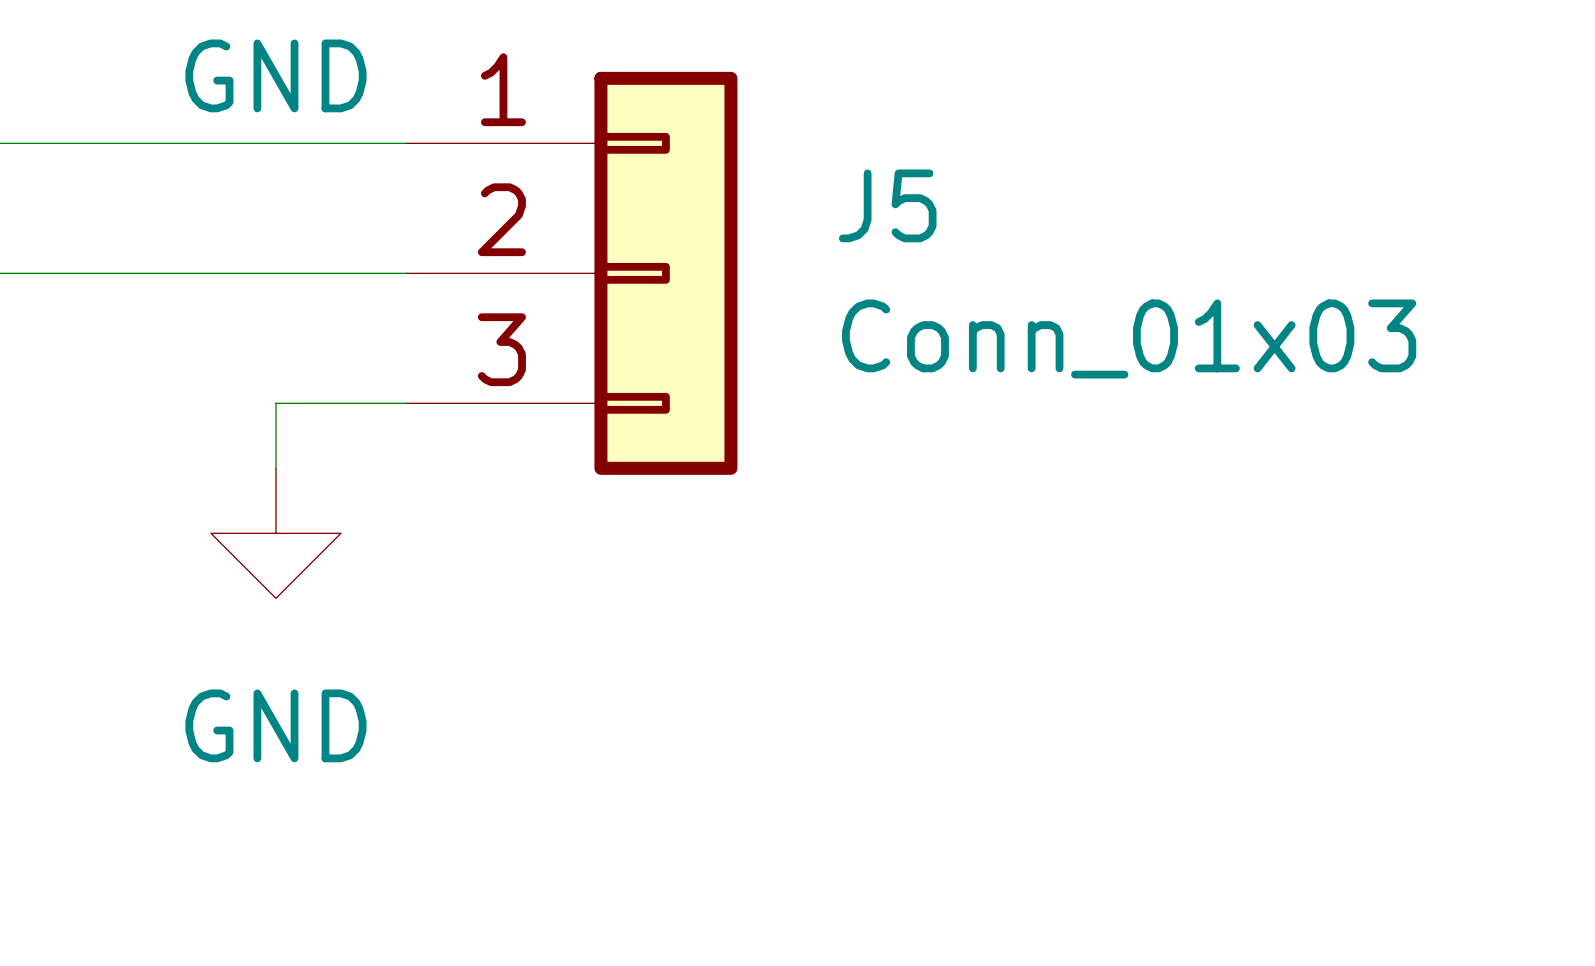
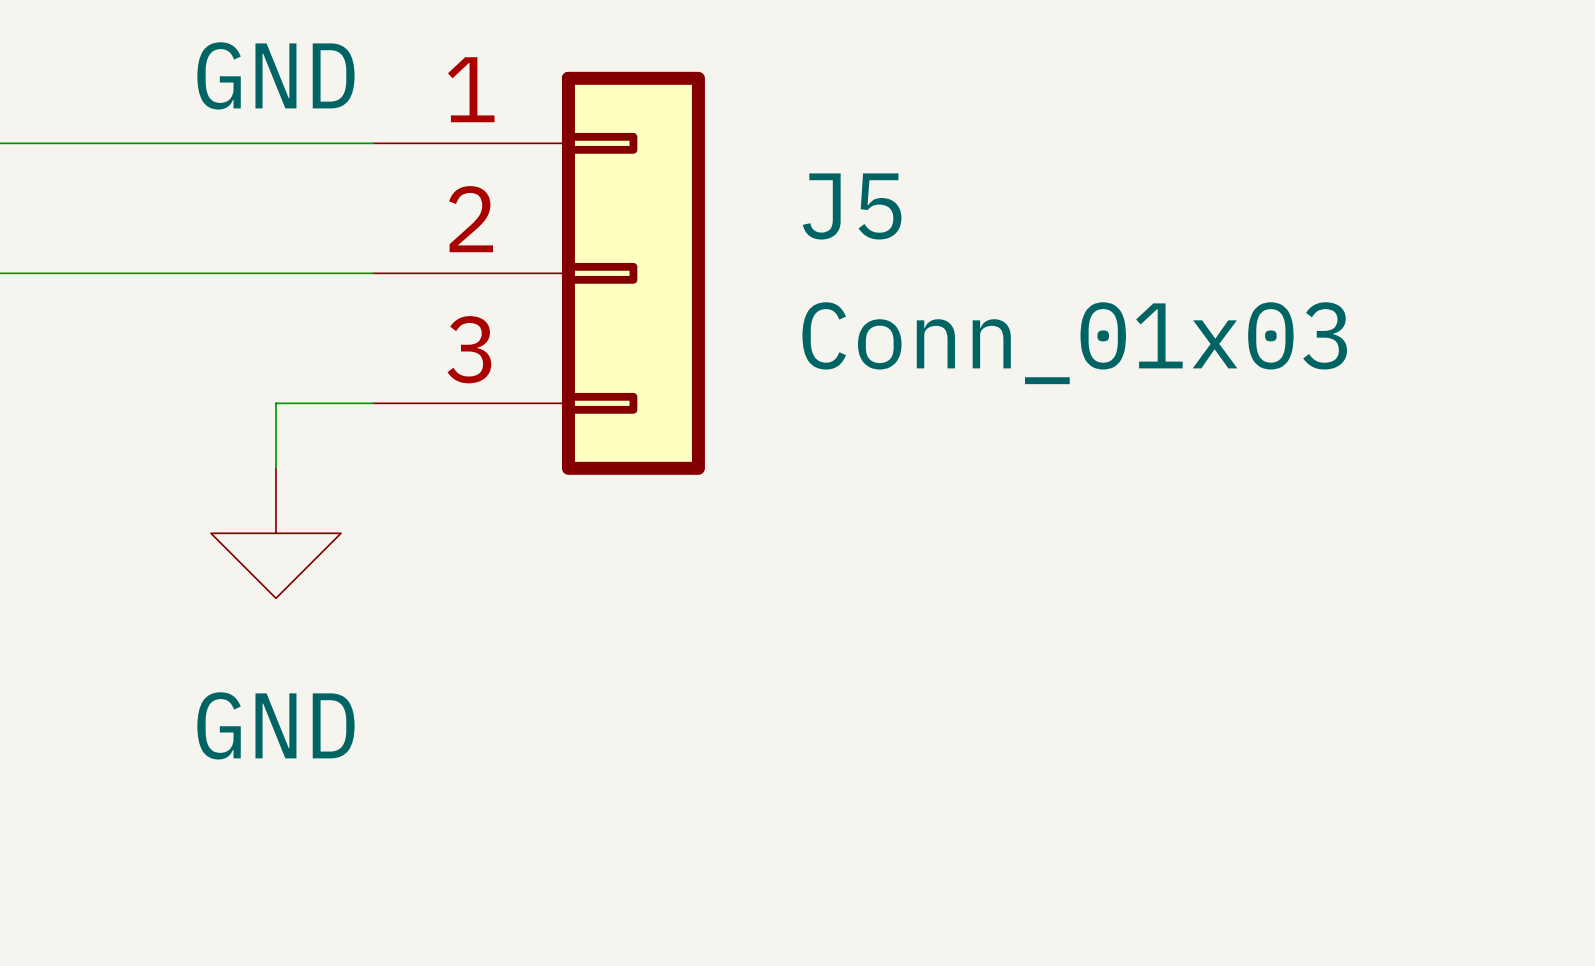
J5 position: (571, 273) -> (539, 273)

